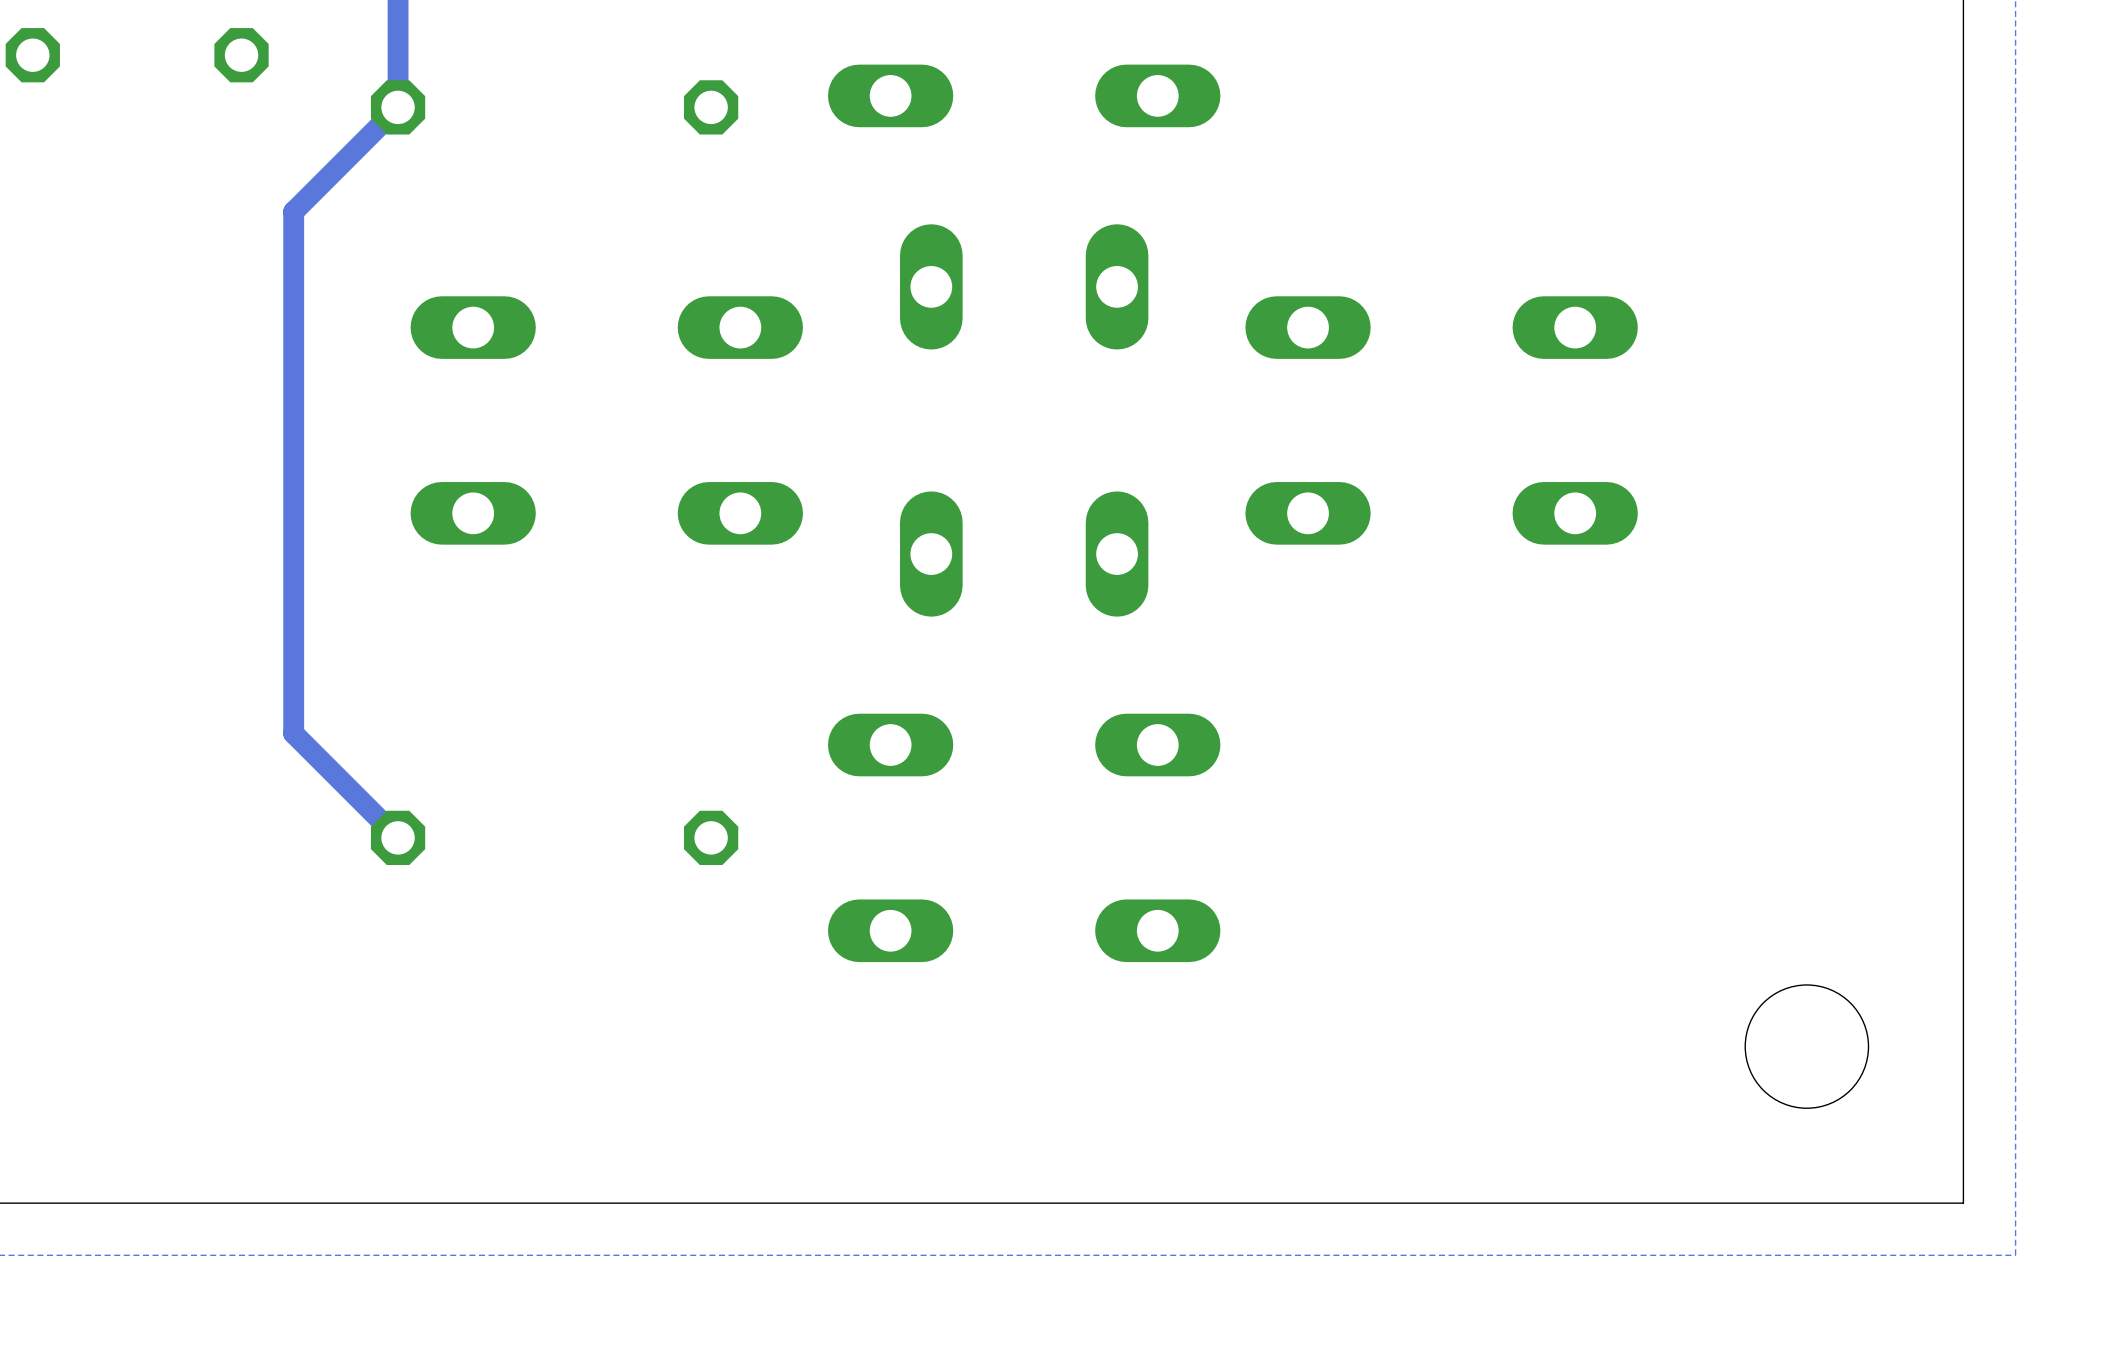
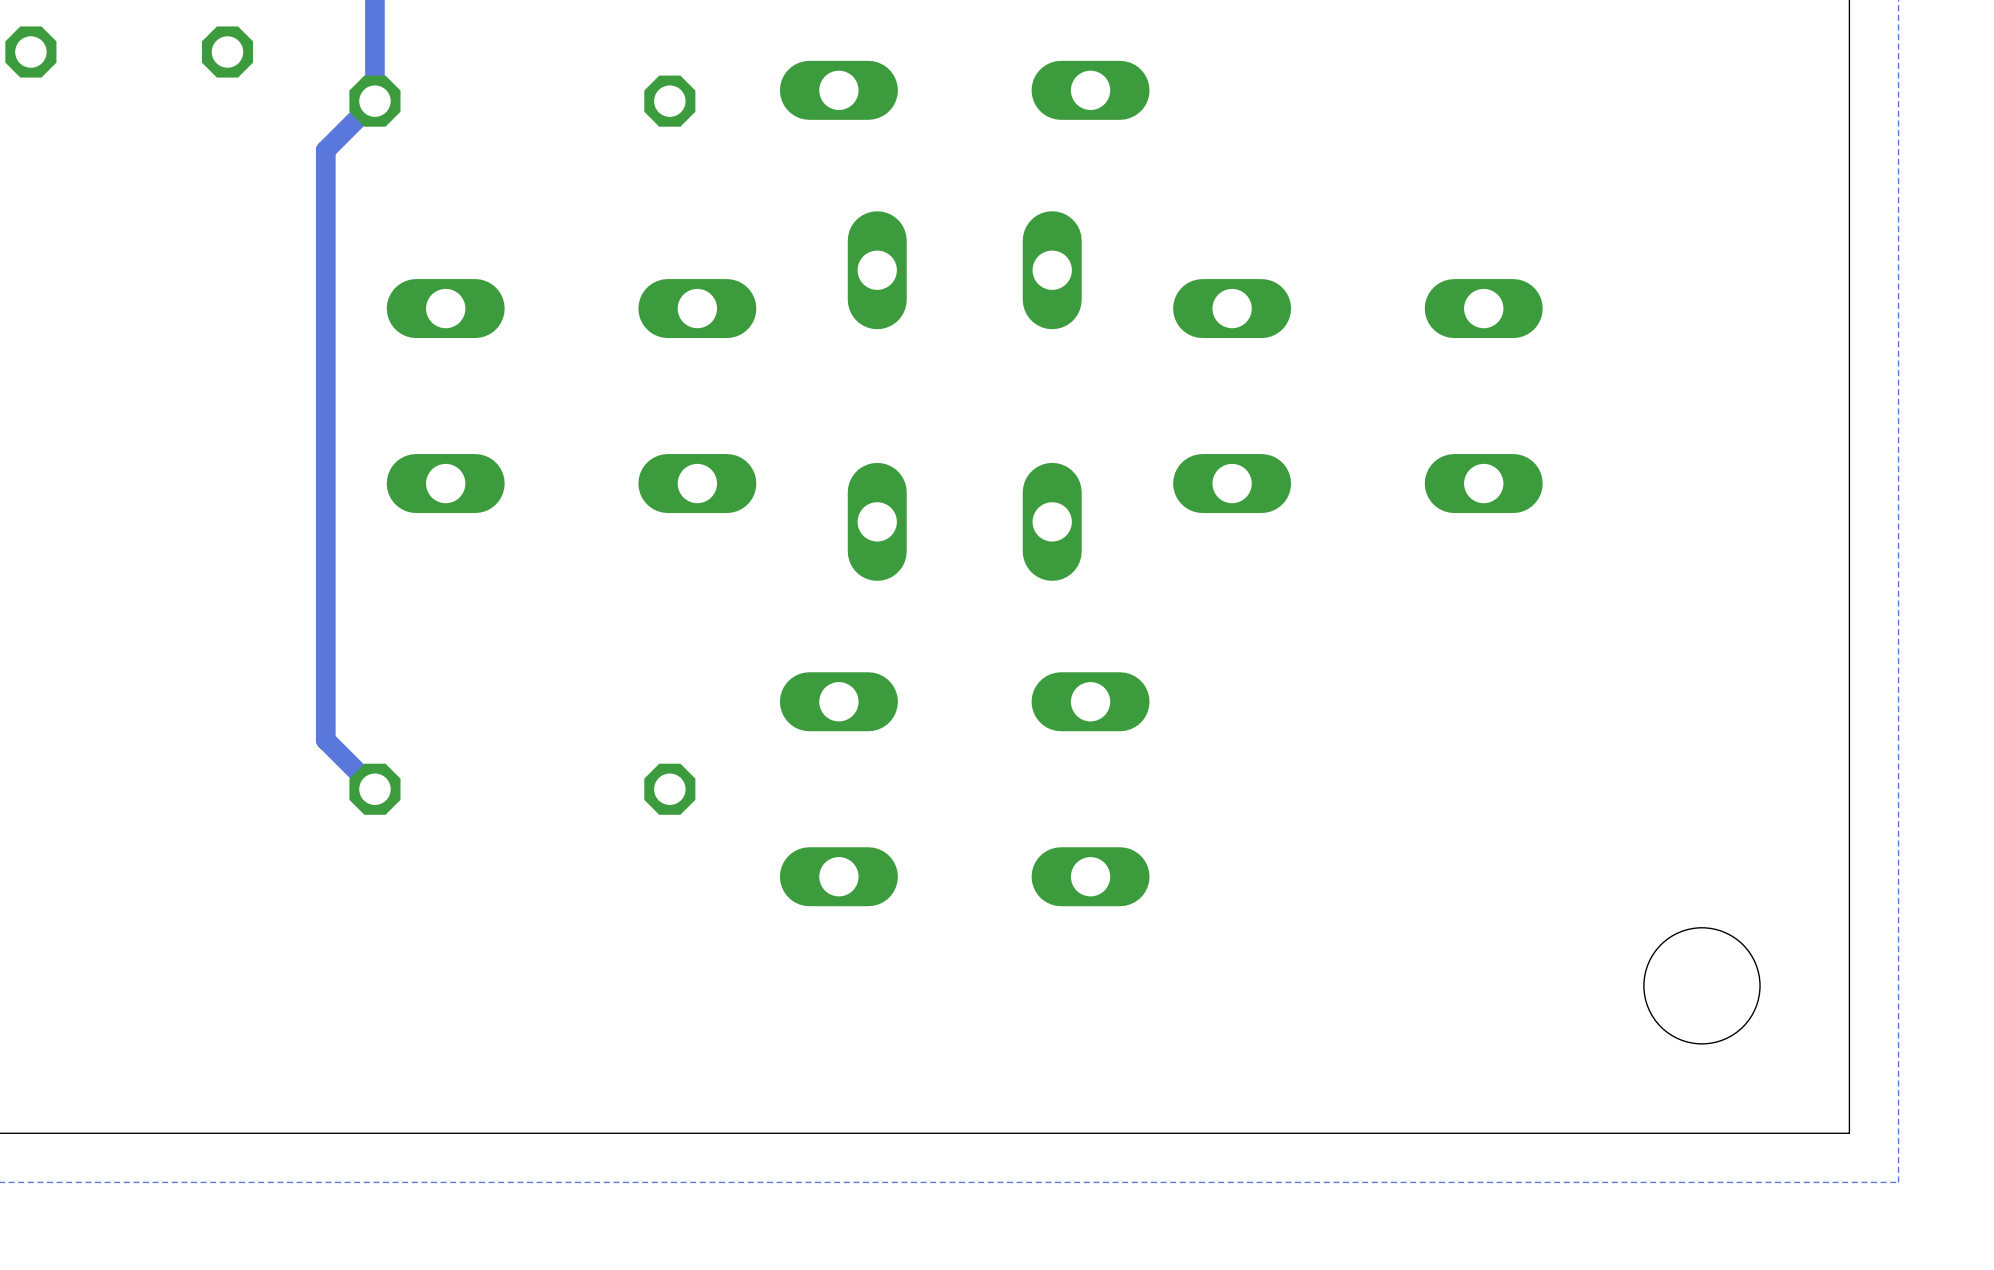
track: (345, 159) (293, 211) (293, 733) (345, 785) -> (325, 150) (325, 740)

